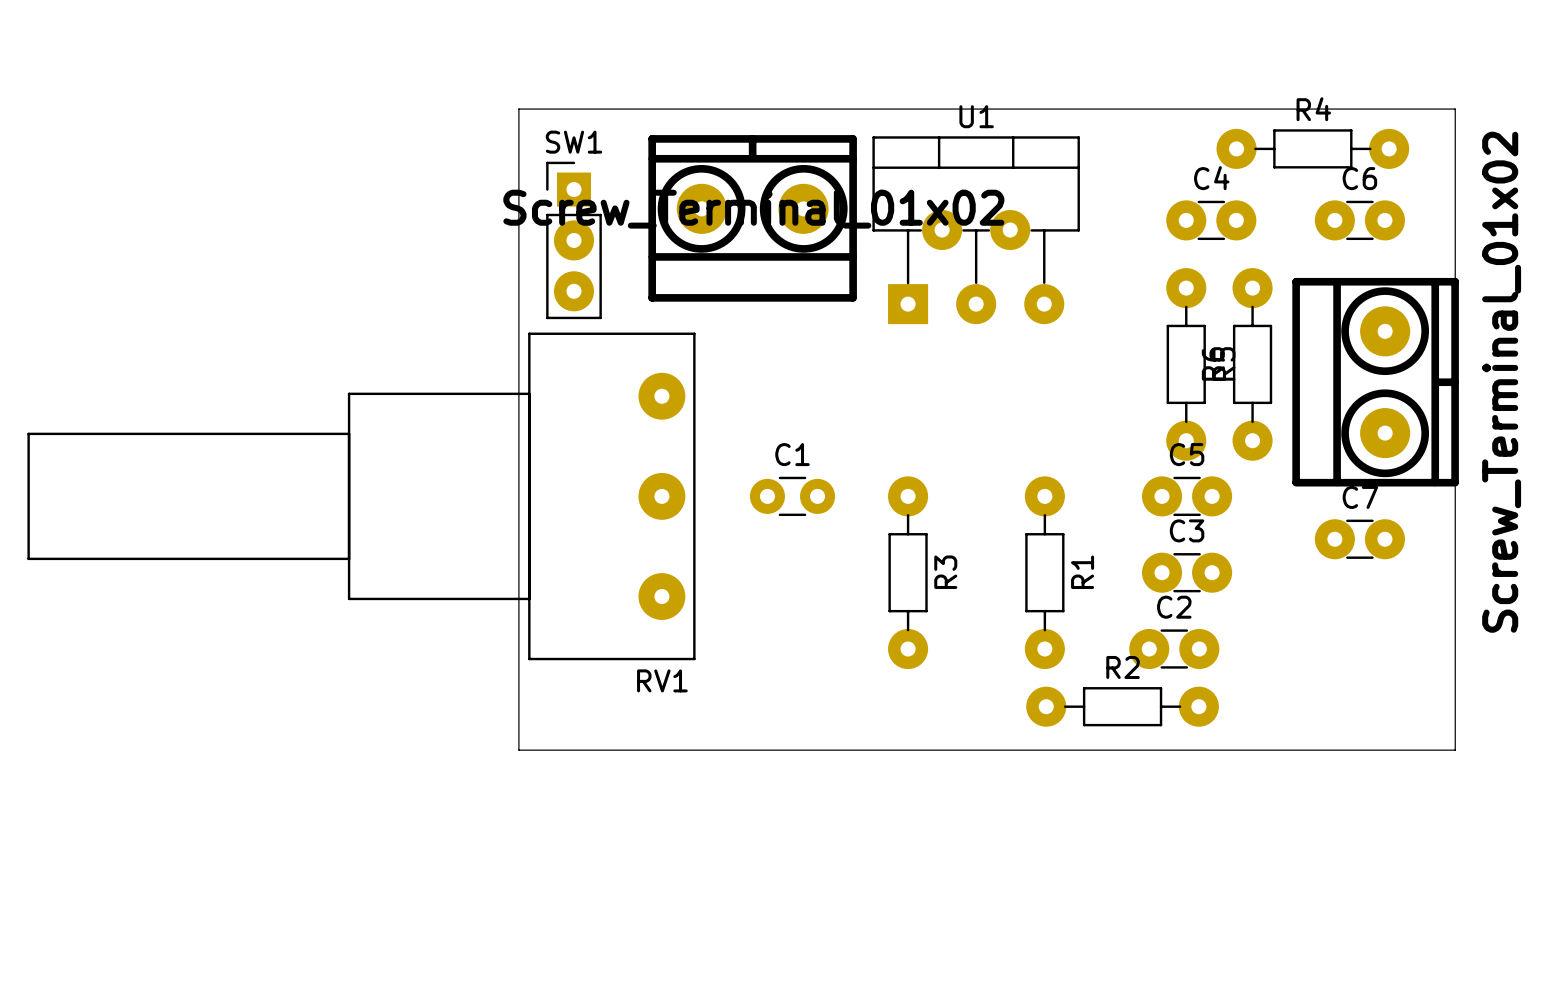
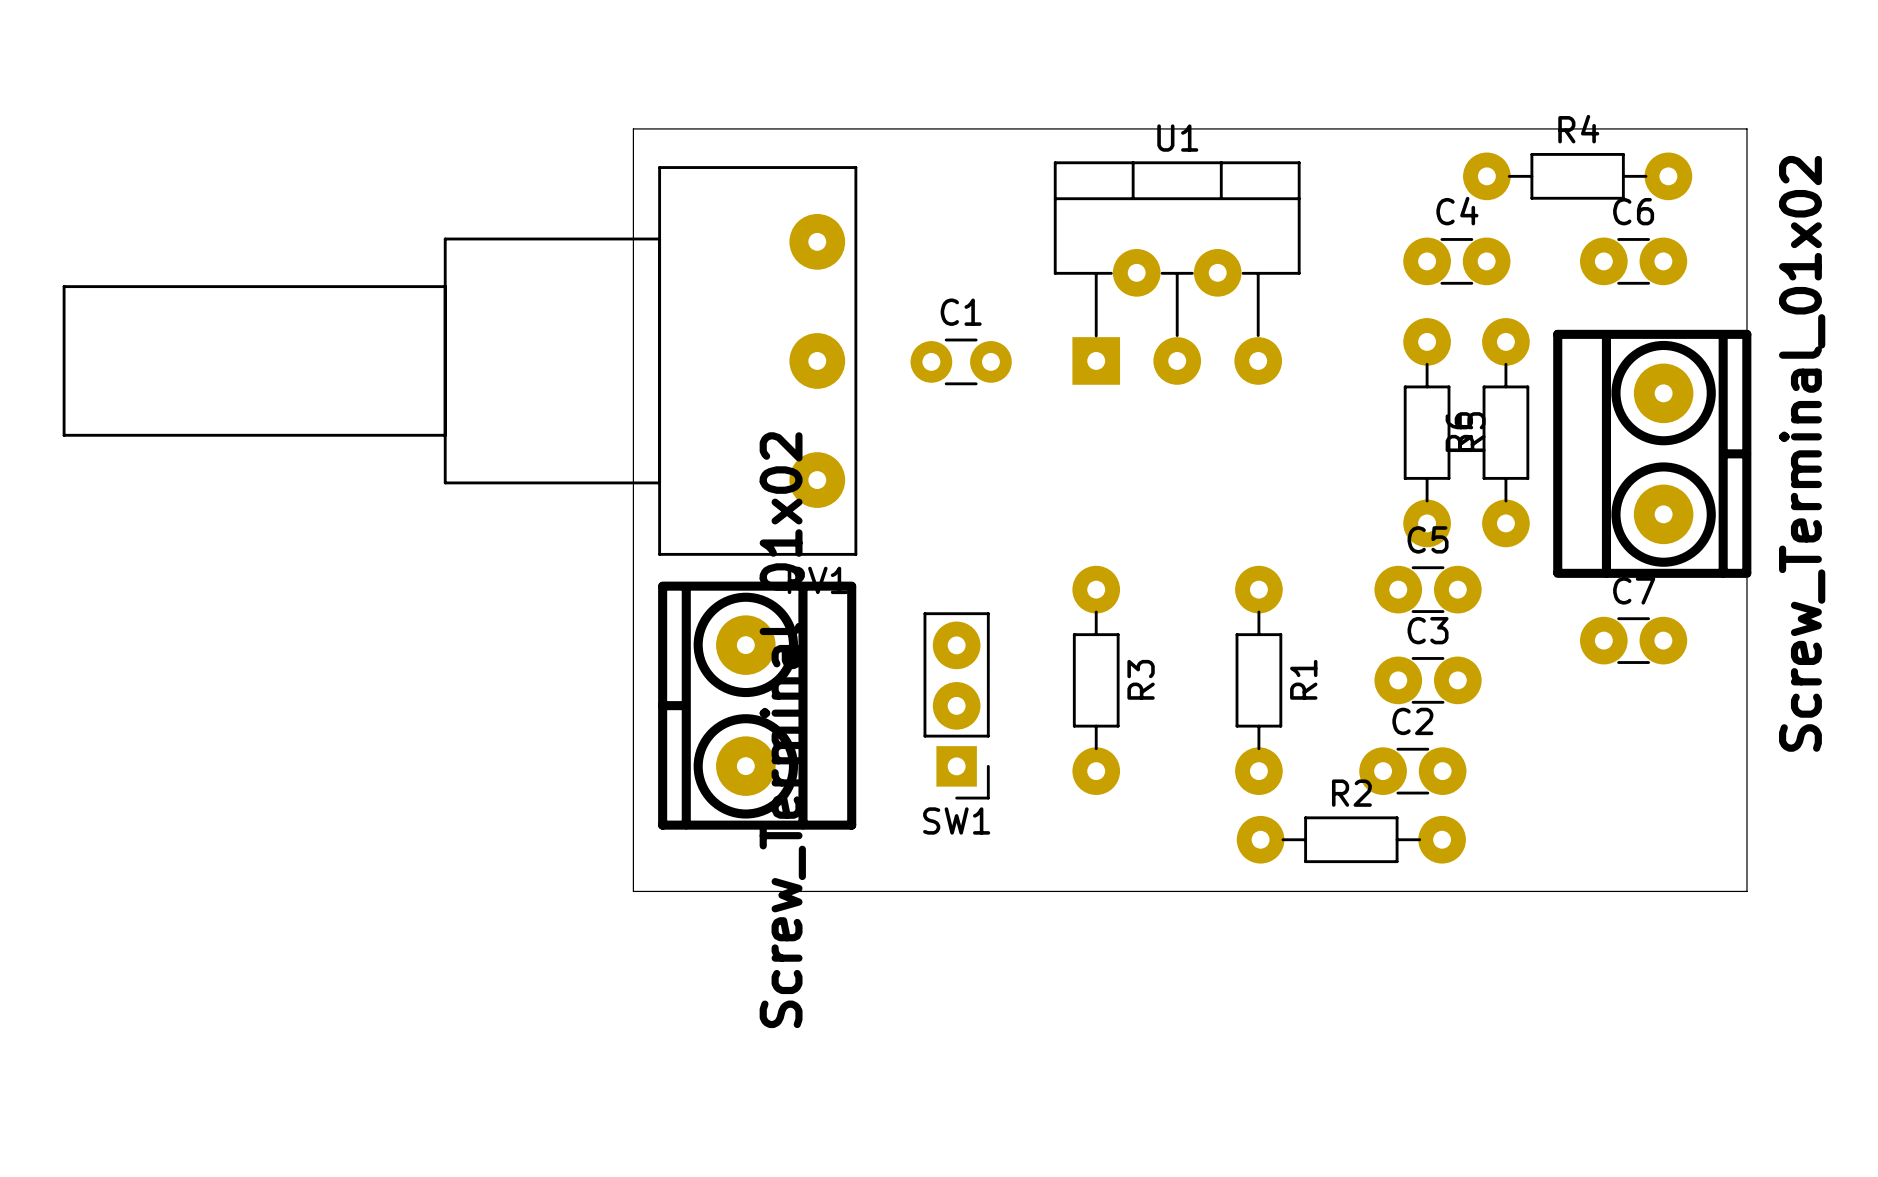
part rotation: 0° (752, 218) -> 90° counterclockwise (757, 705)
part position: (752, 218) -> (757, 705)
SW1 rotation: 0° (573, 240) -> 180° (956, 705)
SW1 position: (573, 240) -> (956, 705)
RV1 position: (361, 496) -> (459, 360)
C1 position: (792, 496) -> (961, 361)

